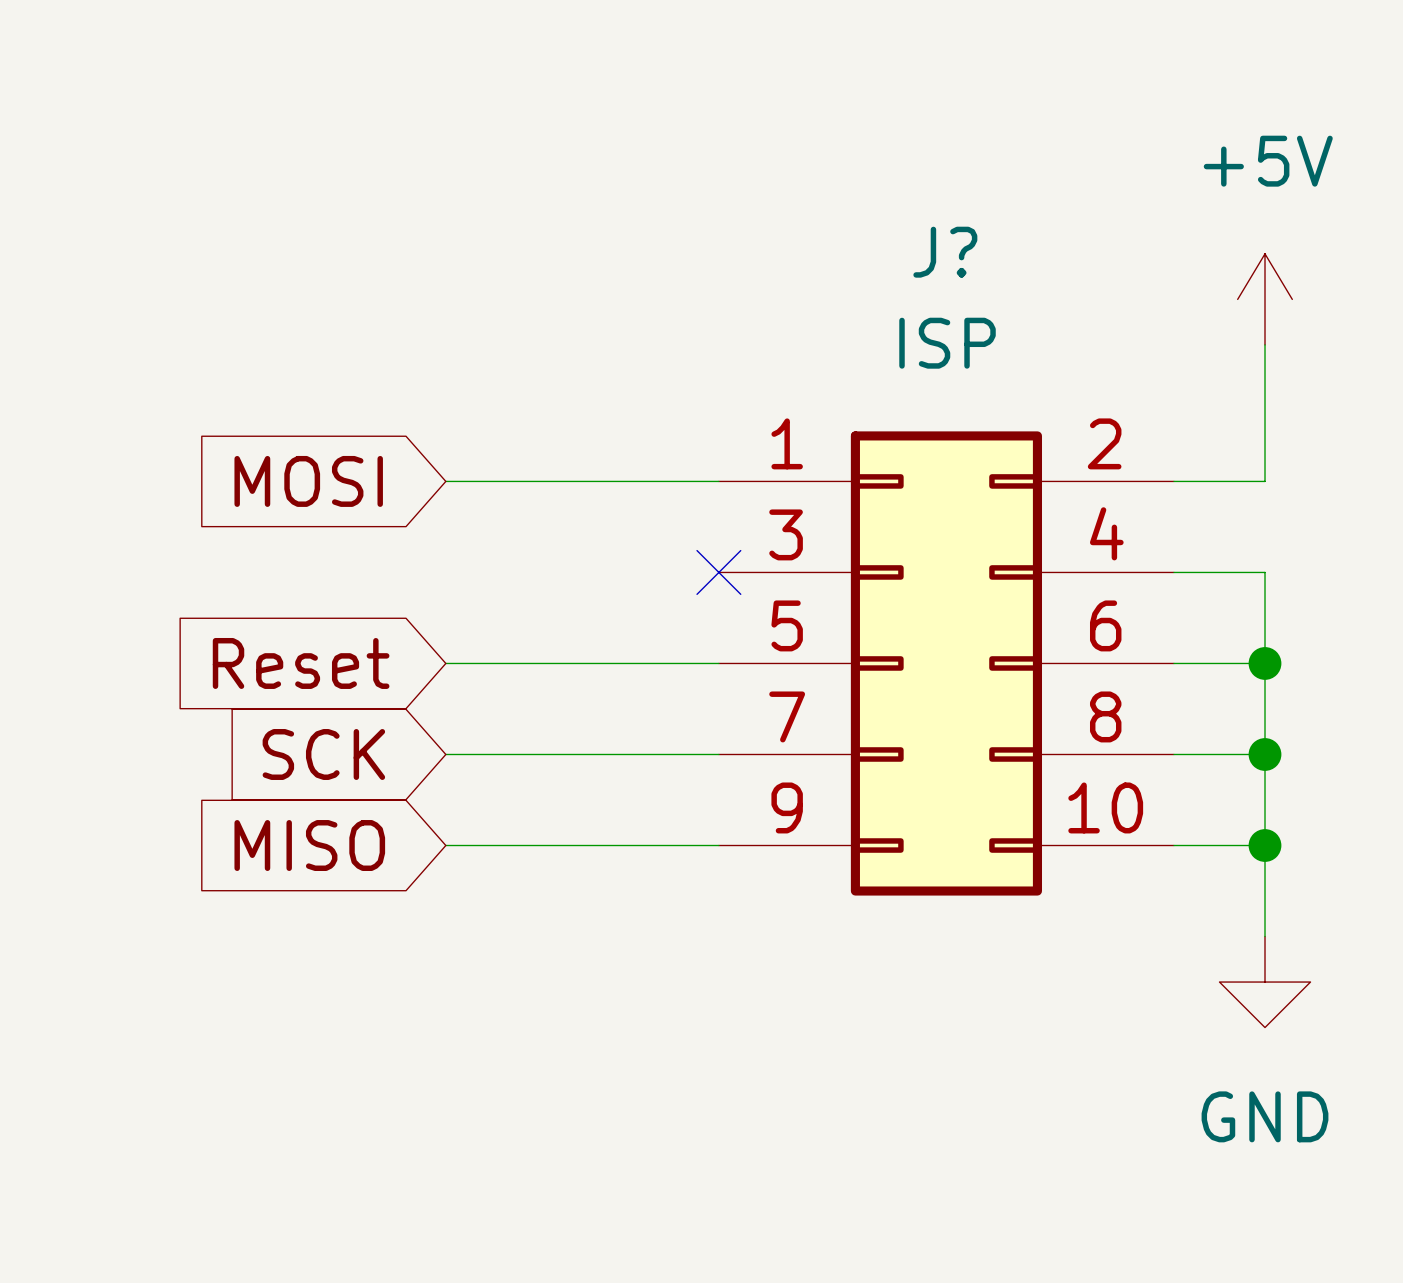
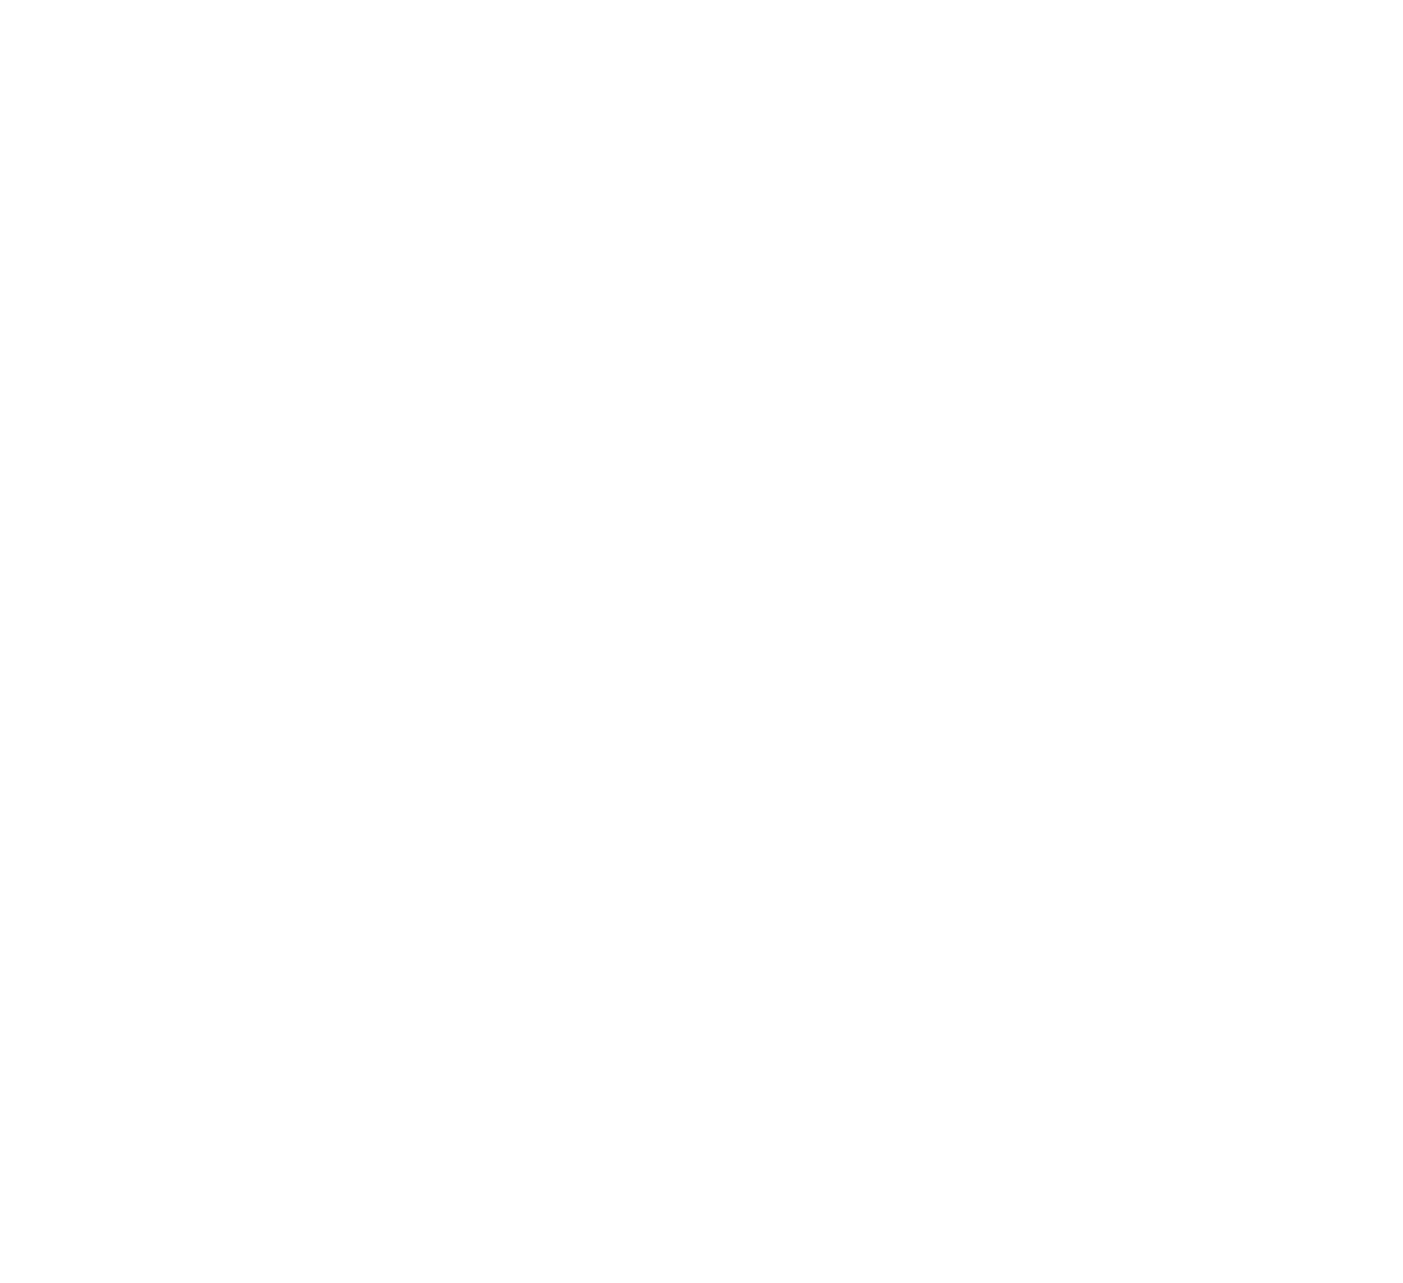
power symbol: +5V (1265, 299) -> none
wire: (1265, 344) (1265, 481) (1173, 481) -> none
global label: MOSI (308, 481) -> none
wire: (445, 481) (718, 481) -> none
no-connect mark: (718, 572) -> none
wire: (1173, 572) (1265, 572) (1265, 936) -> none
global label: Reset (301, 663) -> none
wire: (445, 663) (718, 663) -> none
J?: ISP (946, 663) -> none
wire: (1173, 663) (1265, 663) -> none
junction: (1265, 663) -> none
global label: SCK (323, 754) -> none
wire: (445, 754) (718, 754) -> none
wire: (1173, 754) (1265, 754) -> none
junction: (1265, 754) -> none
global label: MISO (309, 845) -> none
wire: (445, 845) (718, 845) -> none
wire: (1173, 845) (1265, 845) -> none
junction: (1265, 845) -> none
power symbol: GND (1265, 982) -> none

